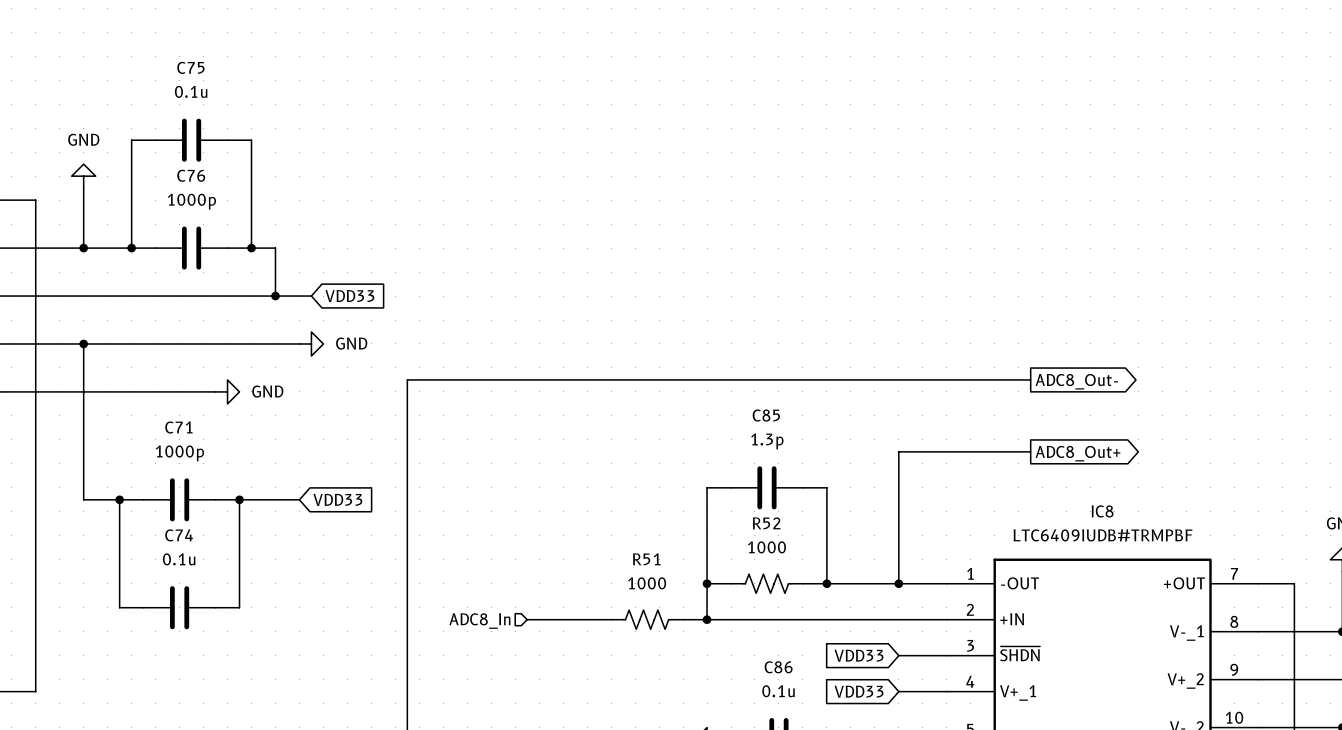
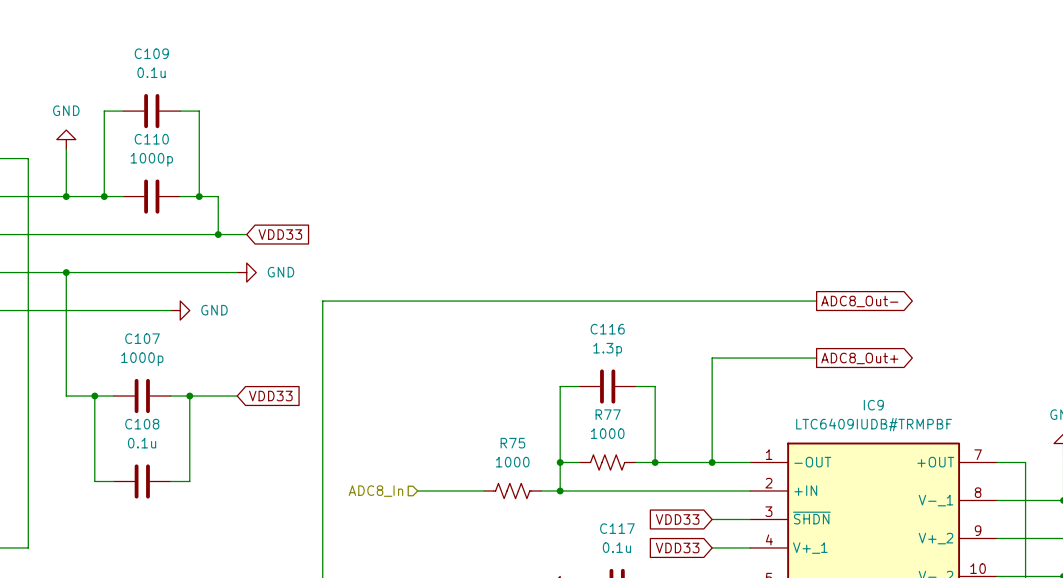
C75 name: C75 (190, 67) -> C109 (151, 53)
C76 name: C76 (191, 175) -> C110 (151, 139)
C85 name: C85 (766, 415) -> C116 (607, 329)
C71 name: C71 (178, 427) -> C107 (142, 338)
IC8 name: IC8 (1102, 511) -> IC9 (873, 405)
R52 name: R52 (766, 523) -> R77 (608, 414)
C74 name: C74 (179, 535) -> C108 (142, 424)
R51 name: R51 (646, 559) -> R75 (512, 443)
C86 name: C86 (778, 667) -> C117 (617, 528)

